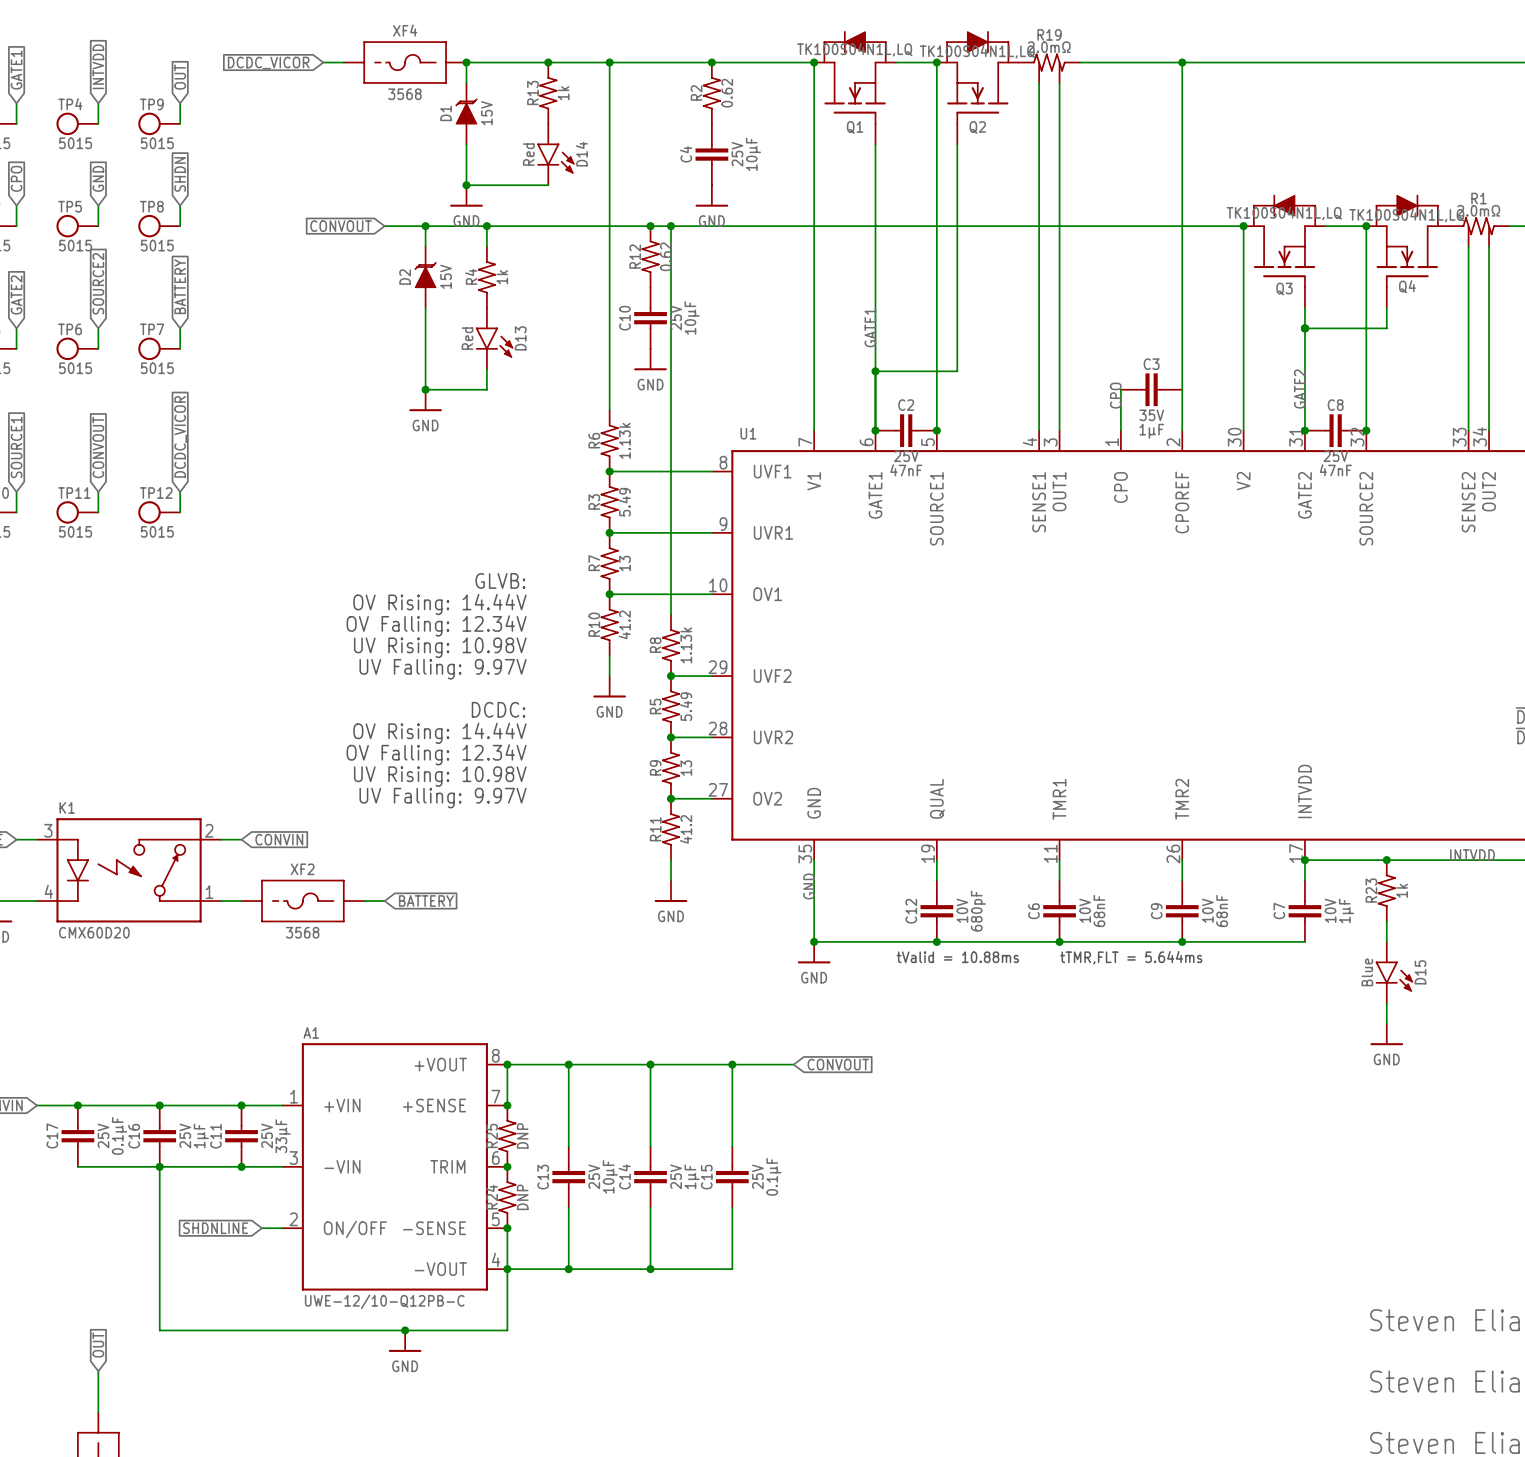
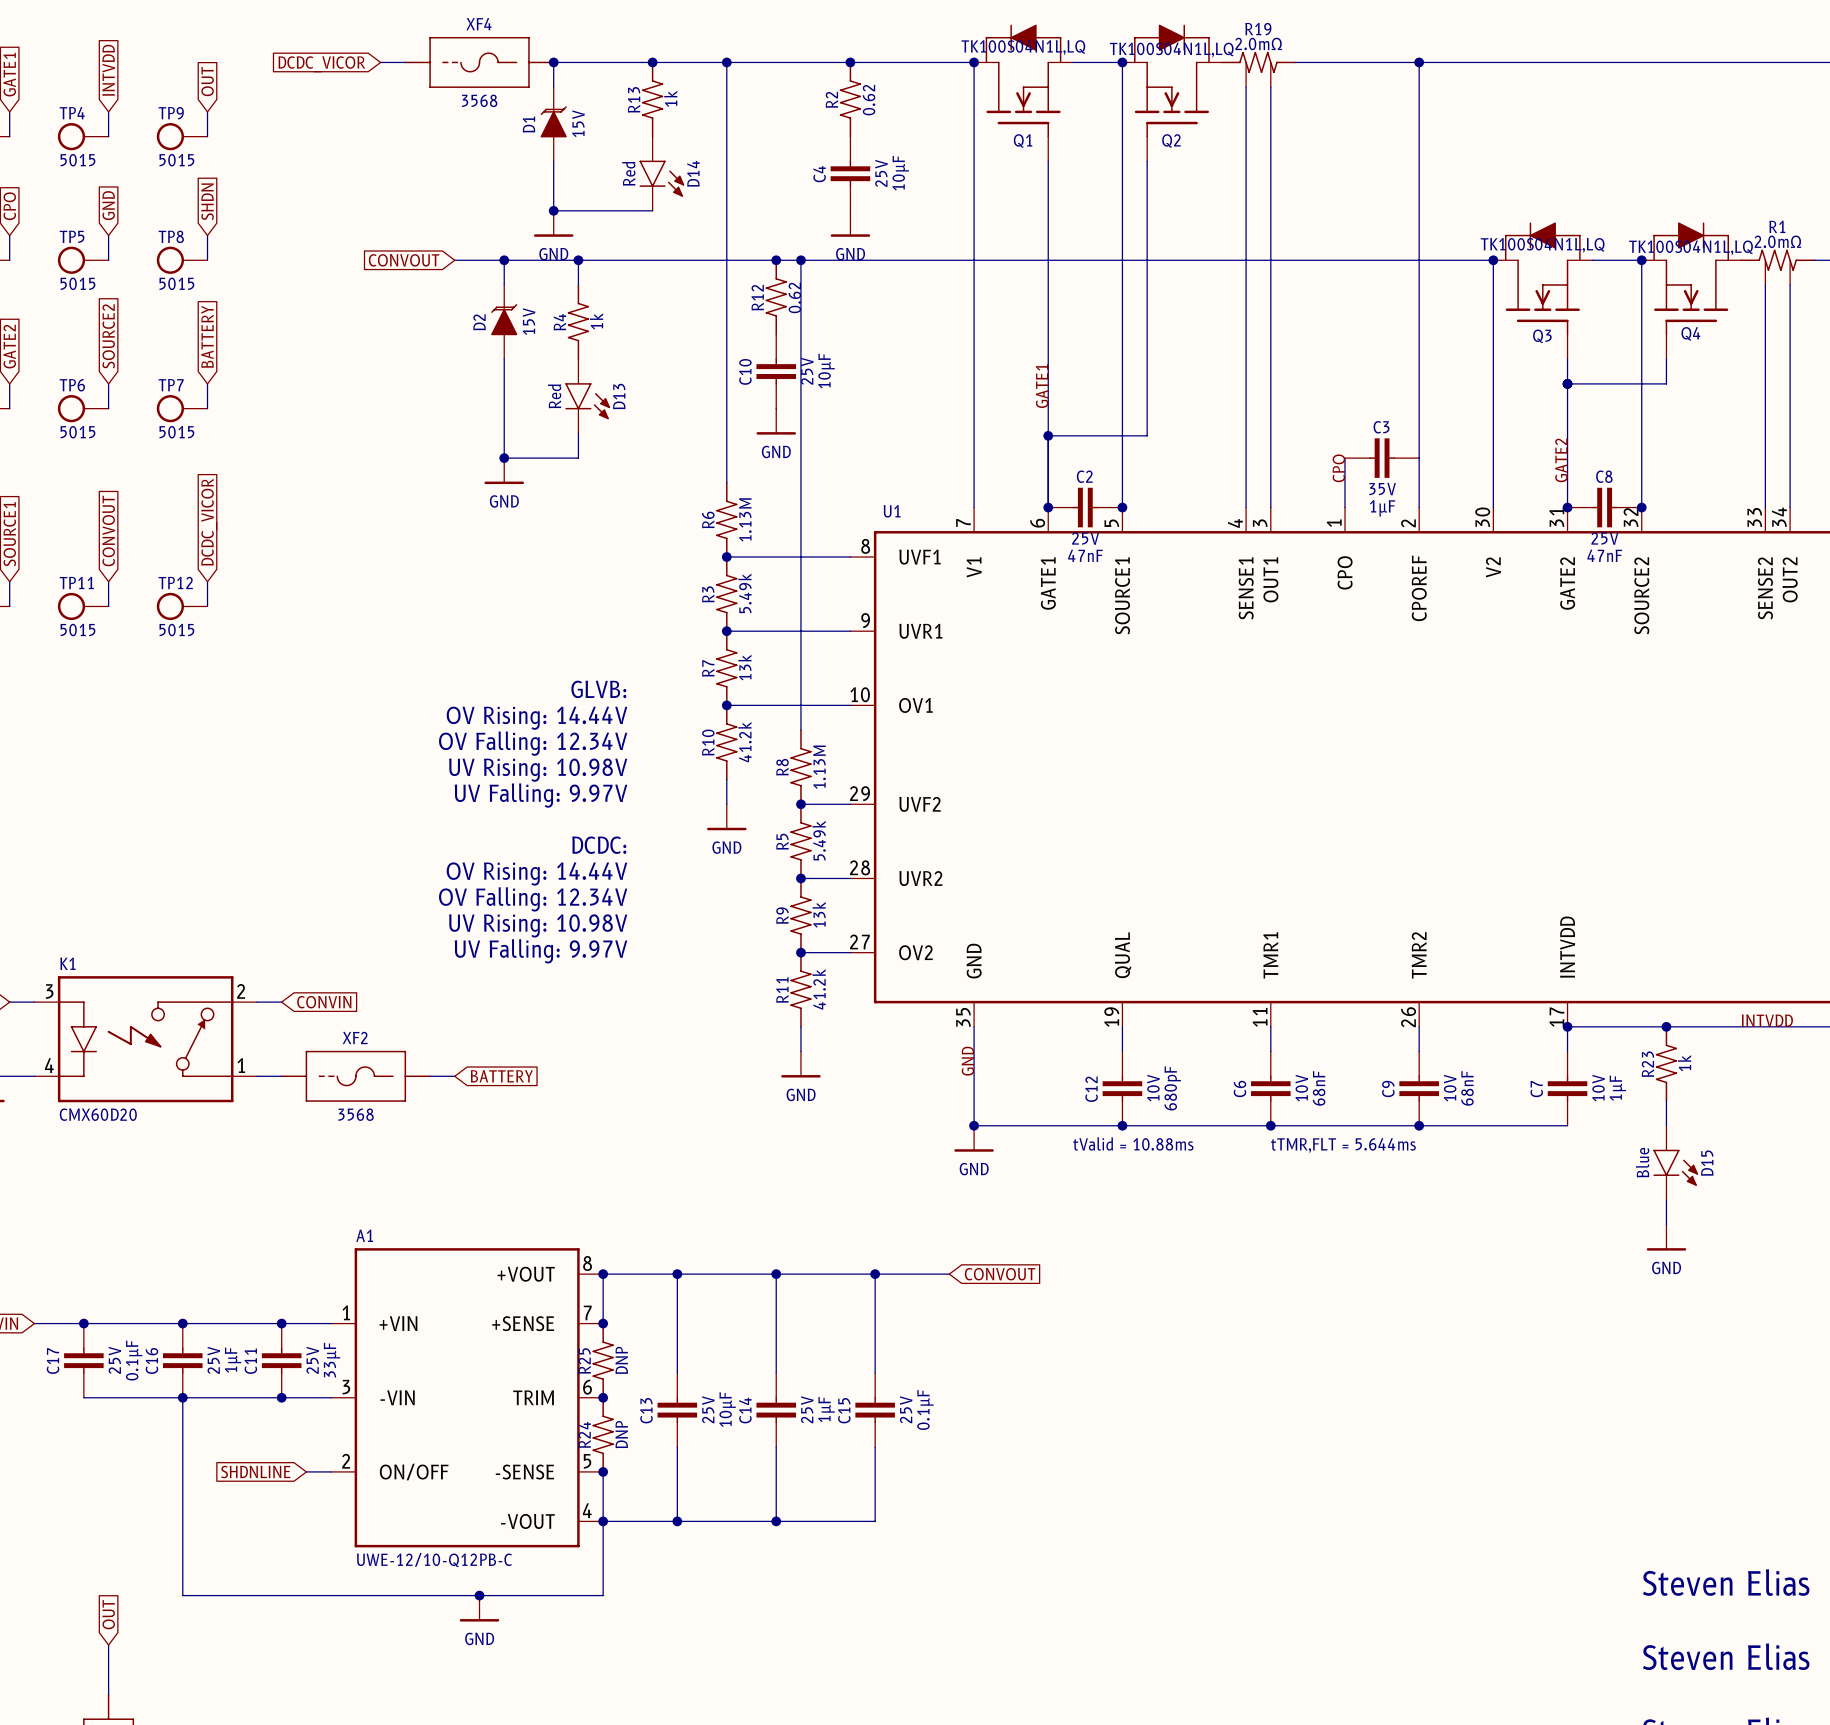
R6 text: 1.13k (624, 440) -> 1.13M (745, 519)
R3 text: 5.49 (624, 502) -> 5.49k (745, 593)
R7 text: 13 (624, 563) -> 13k (744, 667)
R10 text: 41.2 (624, 624) -> 41.2k (745, 742)
R8 text: 1.13k (686, 645) -> 1.13M (819, 767)
R5 text: 5.49 (686, 706) -> 5.49k (819, 840)
R9 text: 13 (686, 768) -> 13k (819, 914)
R11 text: 41.2 (686, 829) -> 41.2k (819, 989)

